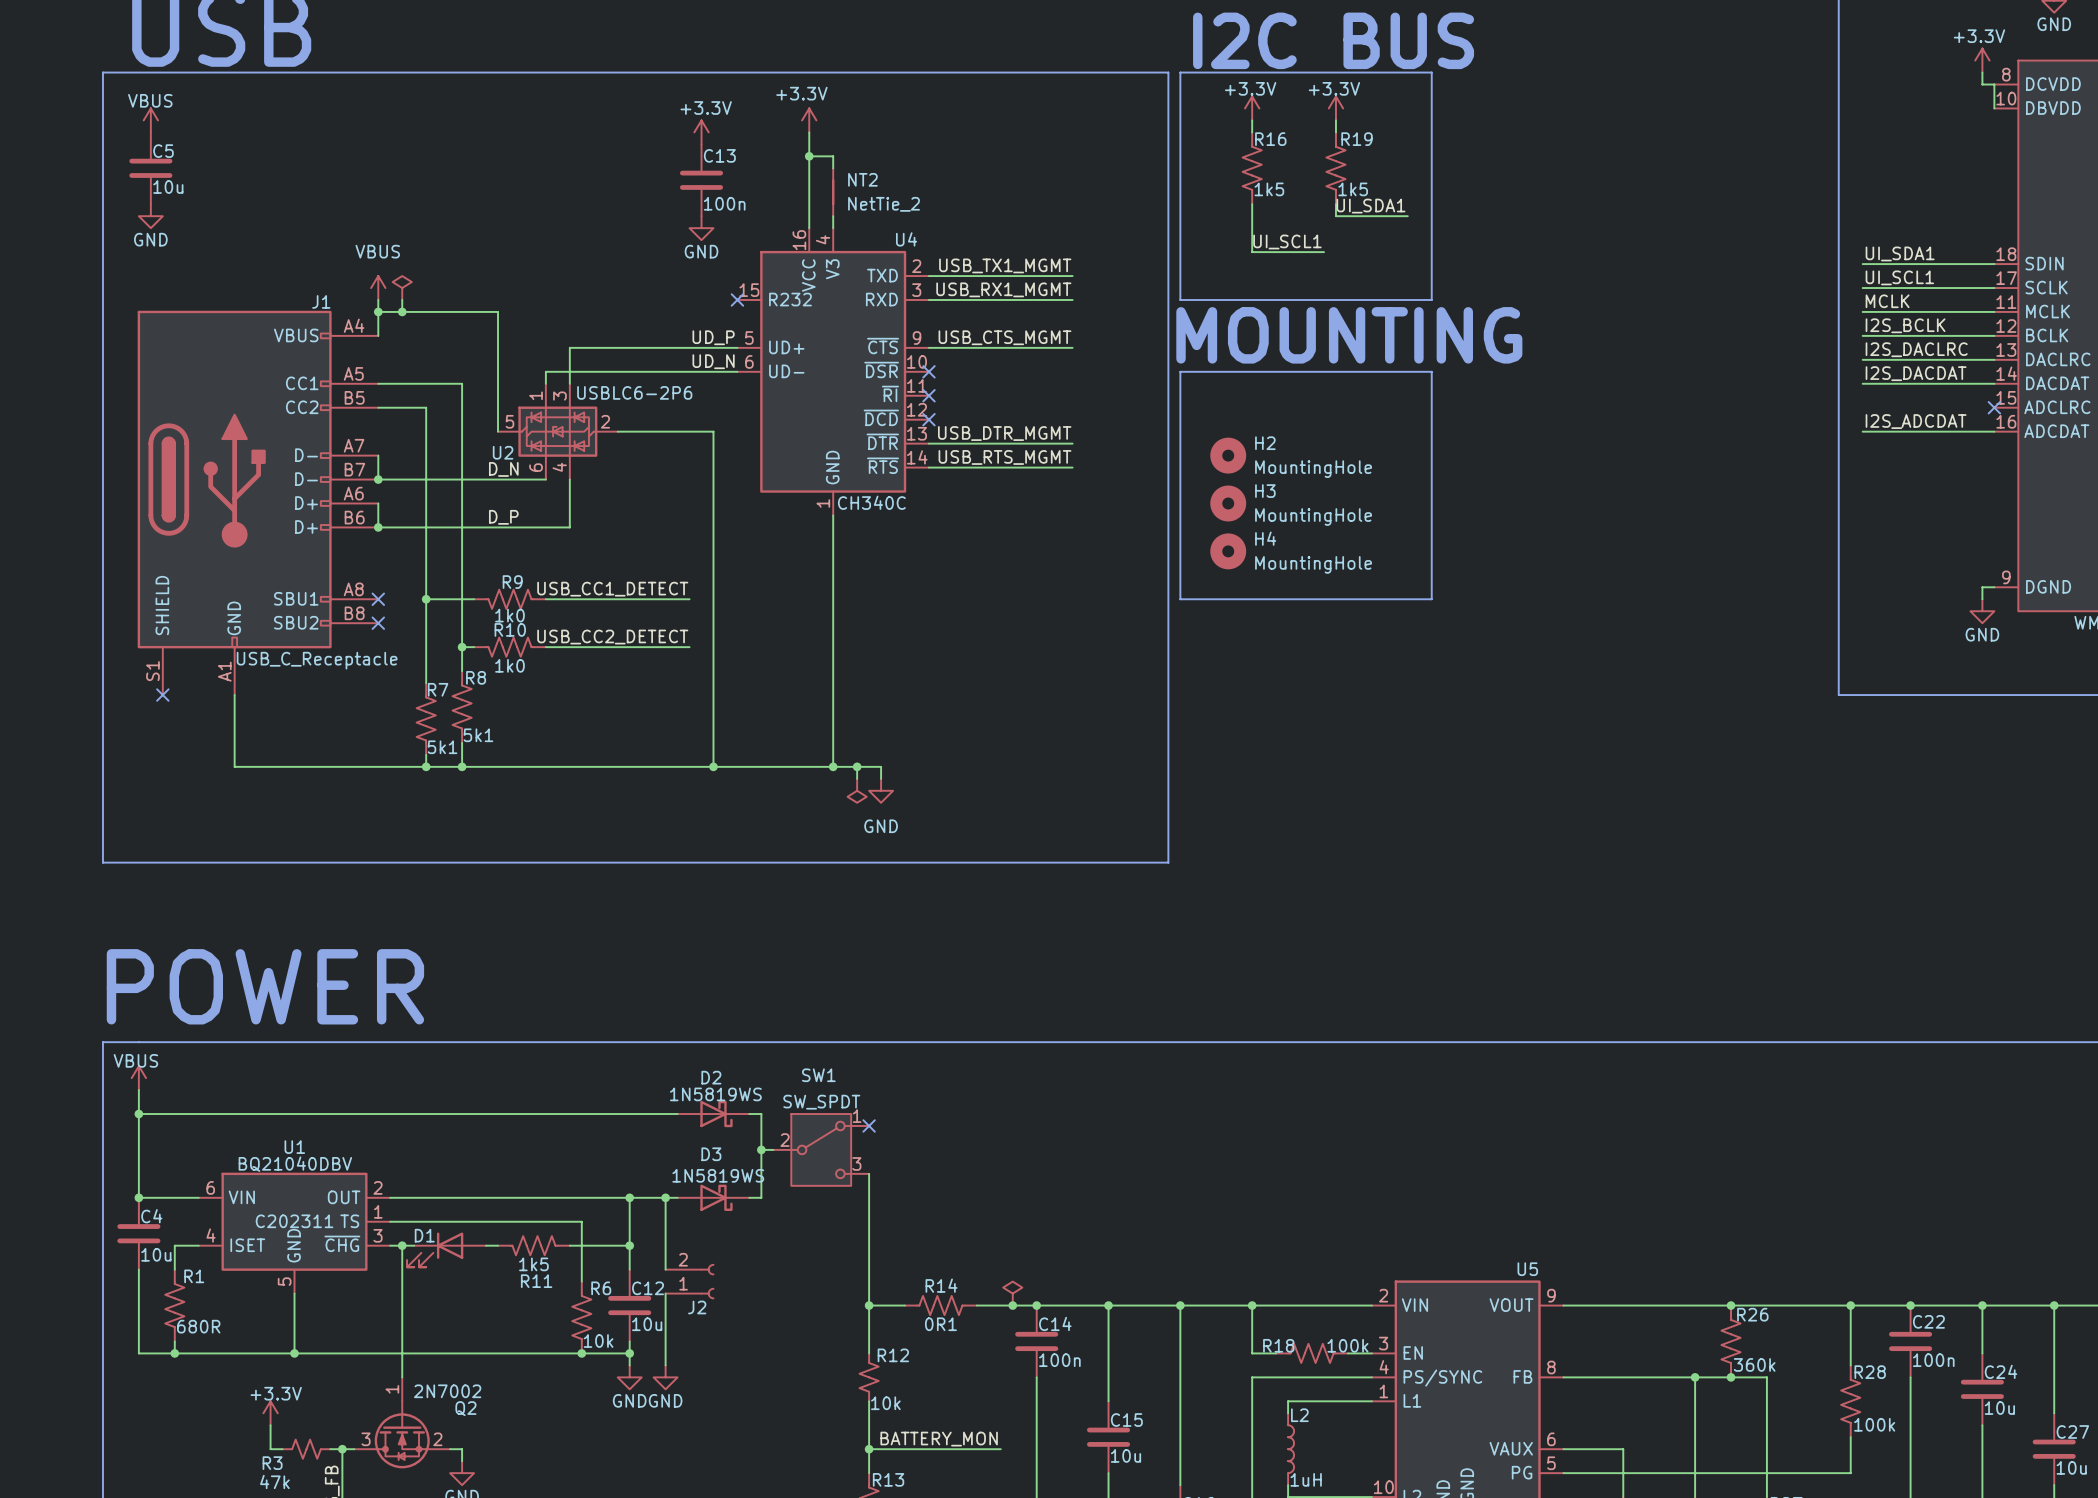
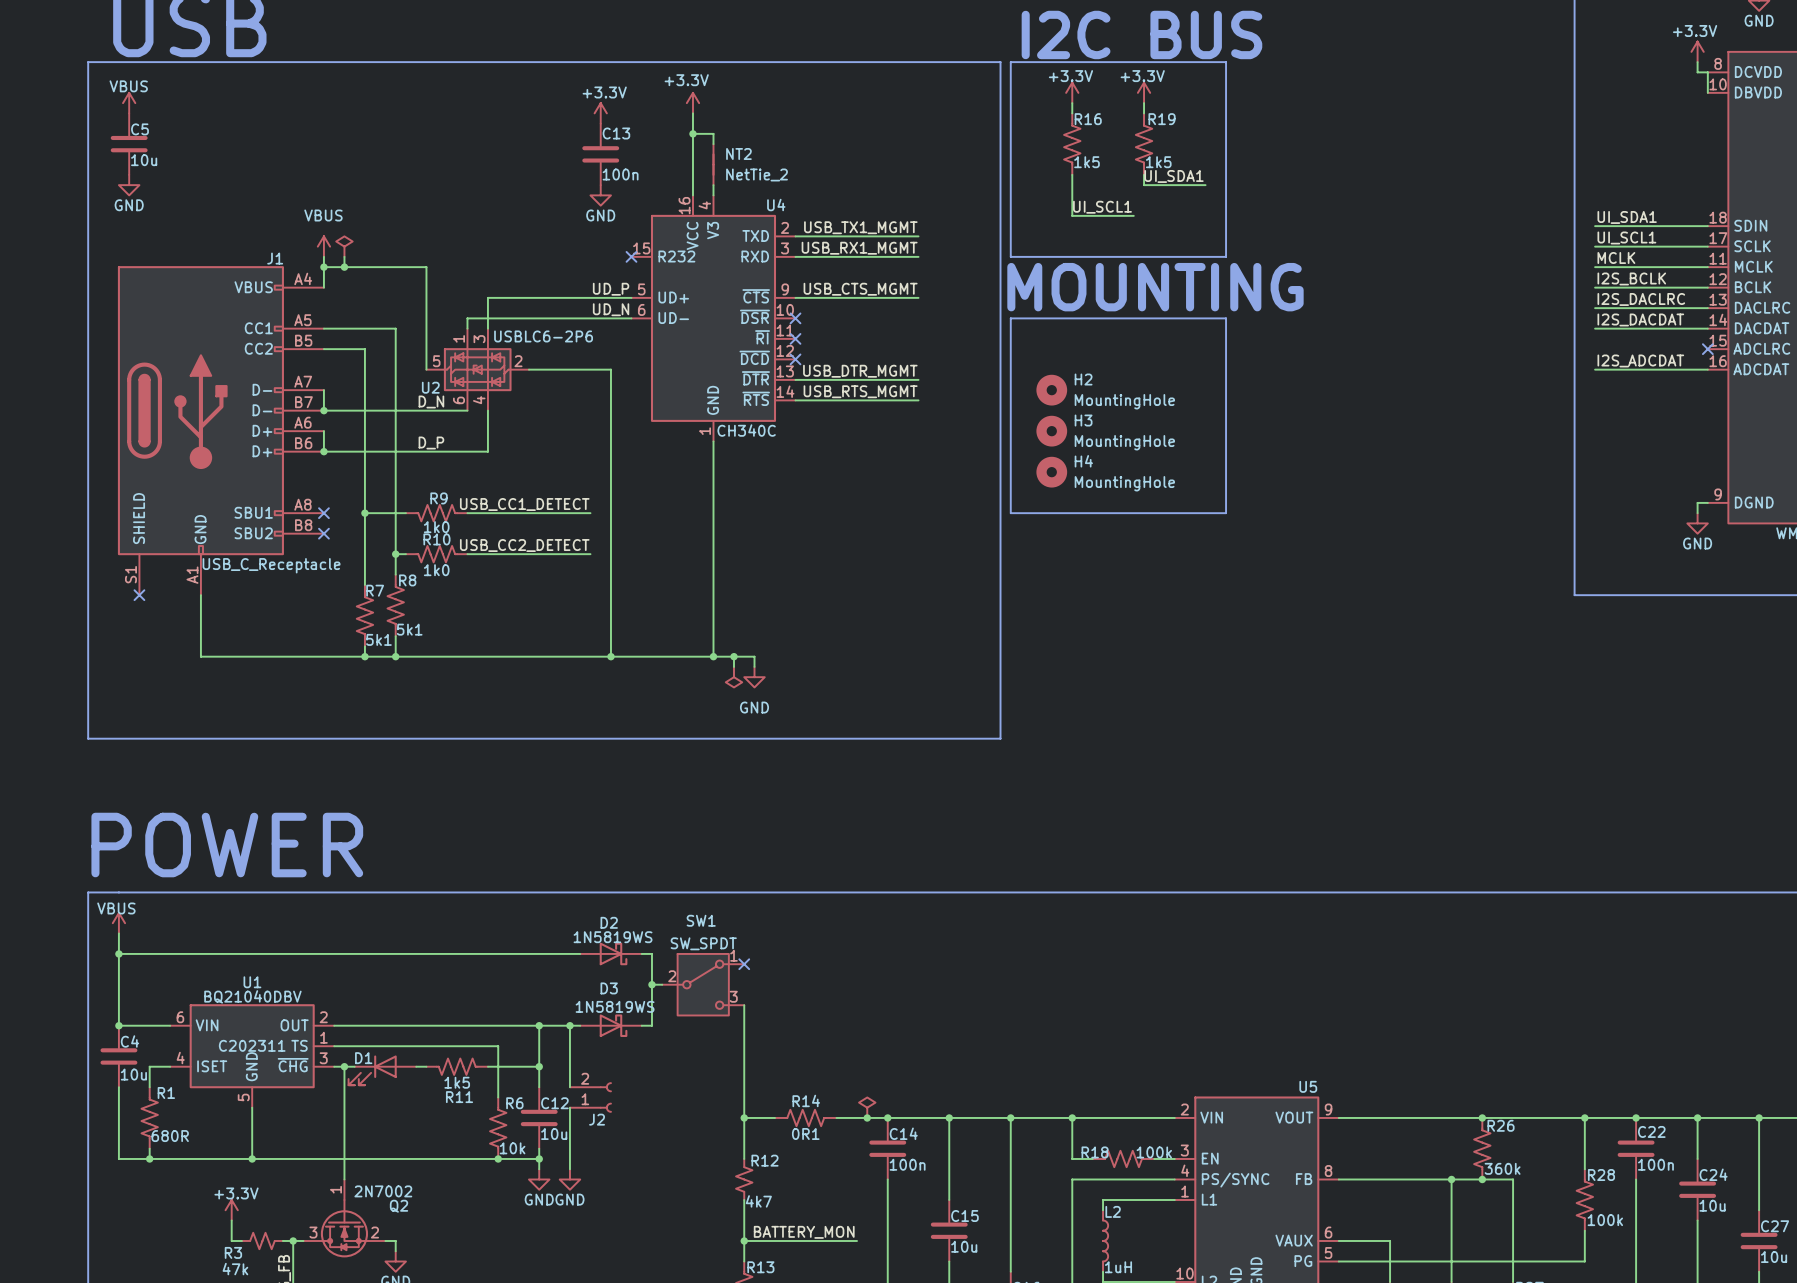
R12 value: 10k (885, 1403) -> 4k7 (758, 1201)

